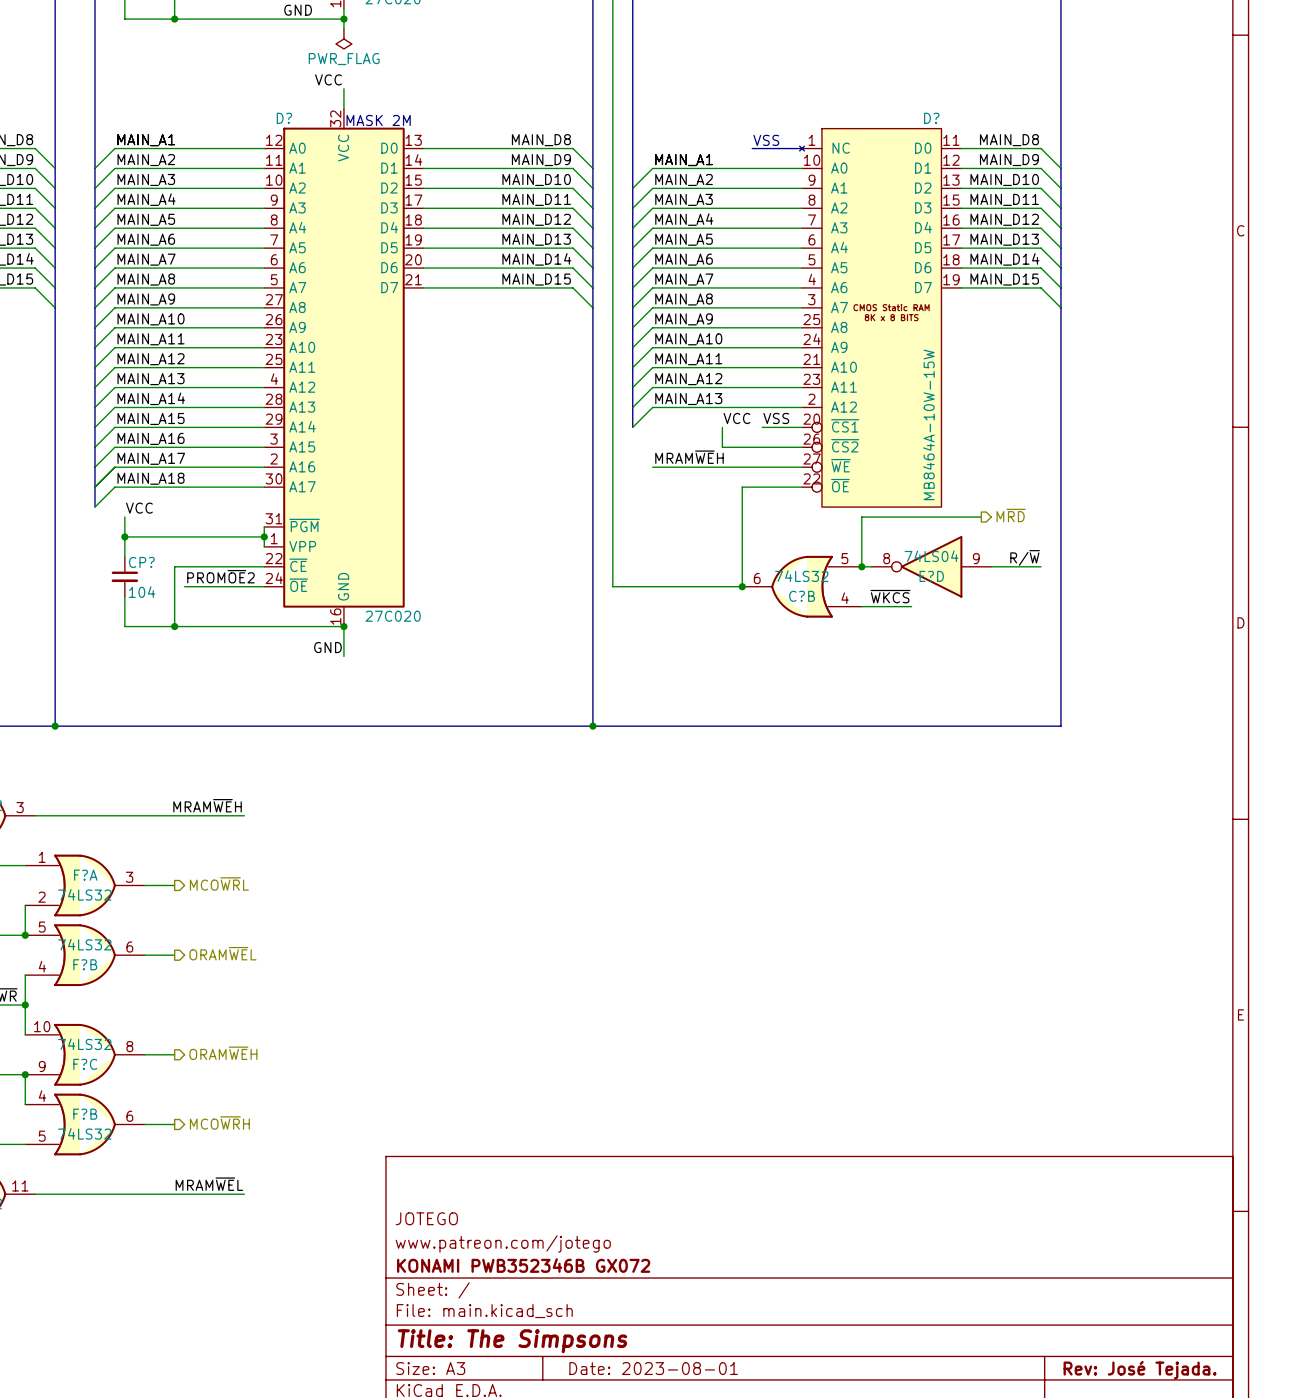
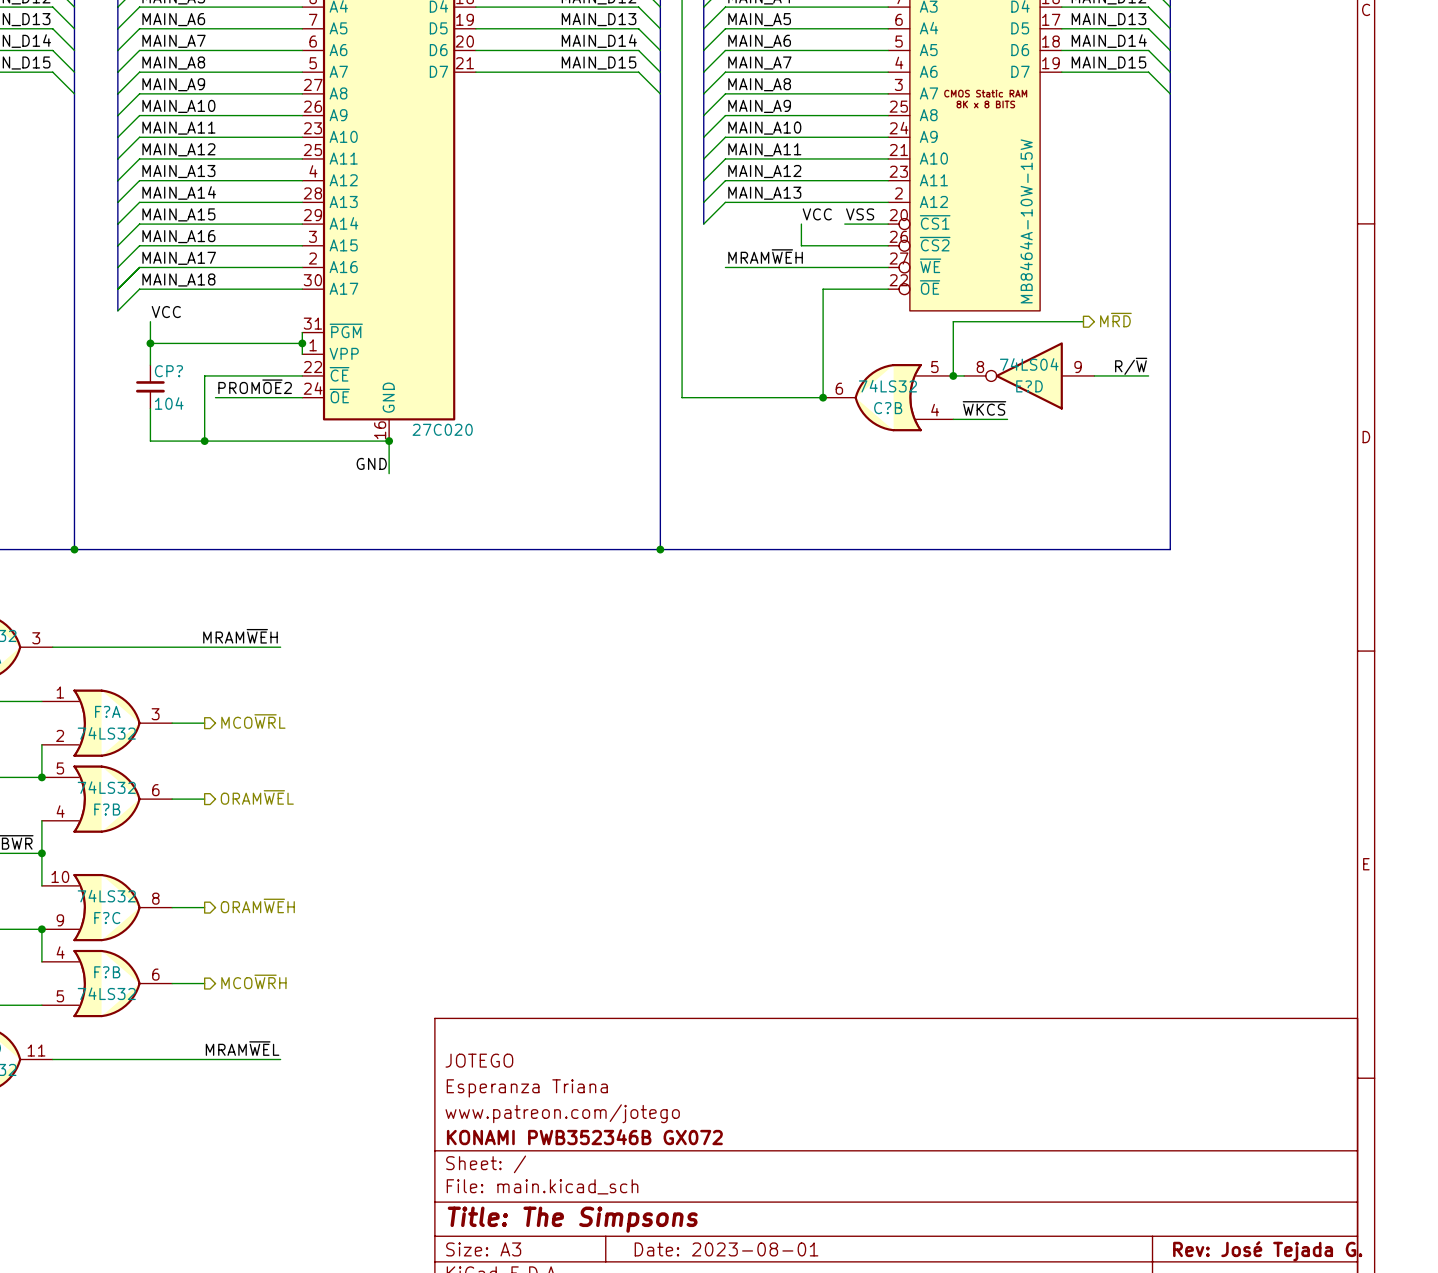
title block: none -> JOTEGO (479, 1060)
title block: JOTEGO (426, 1218) -> Esperanza Triana (527, 1088)
title block: Rev: José Tejada. (1140, 1370) -> Rev: José Tejada G. (1267, 1251)

